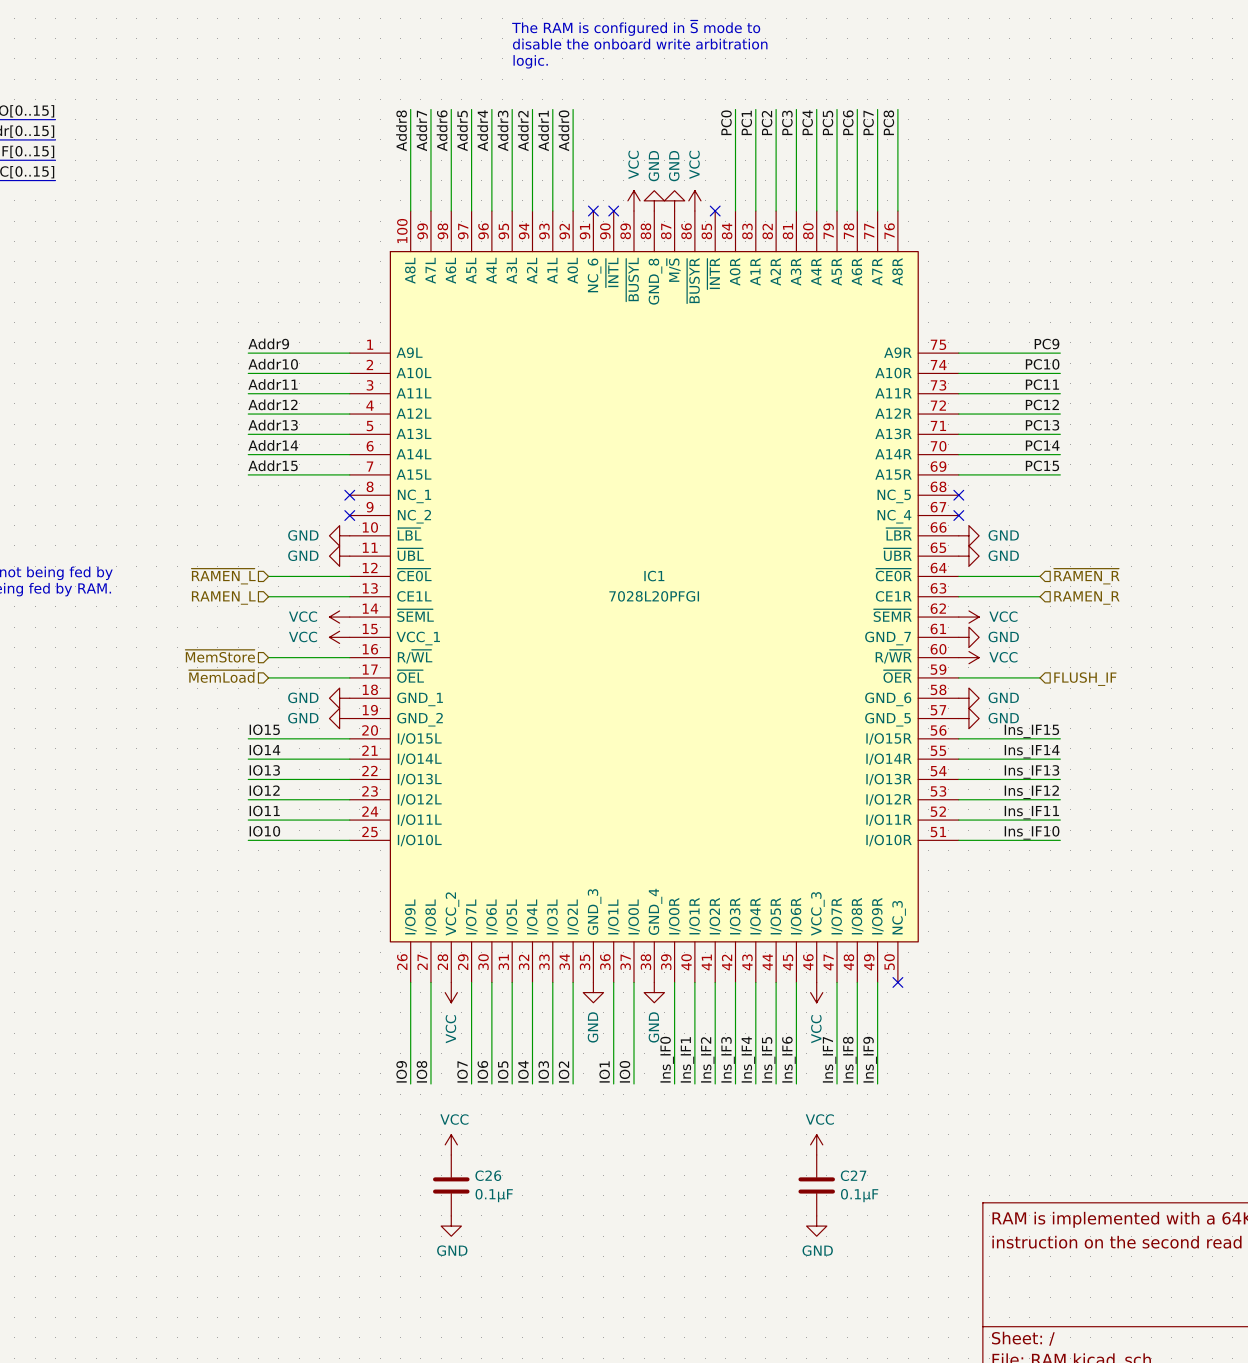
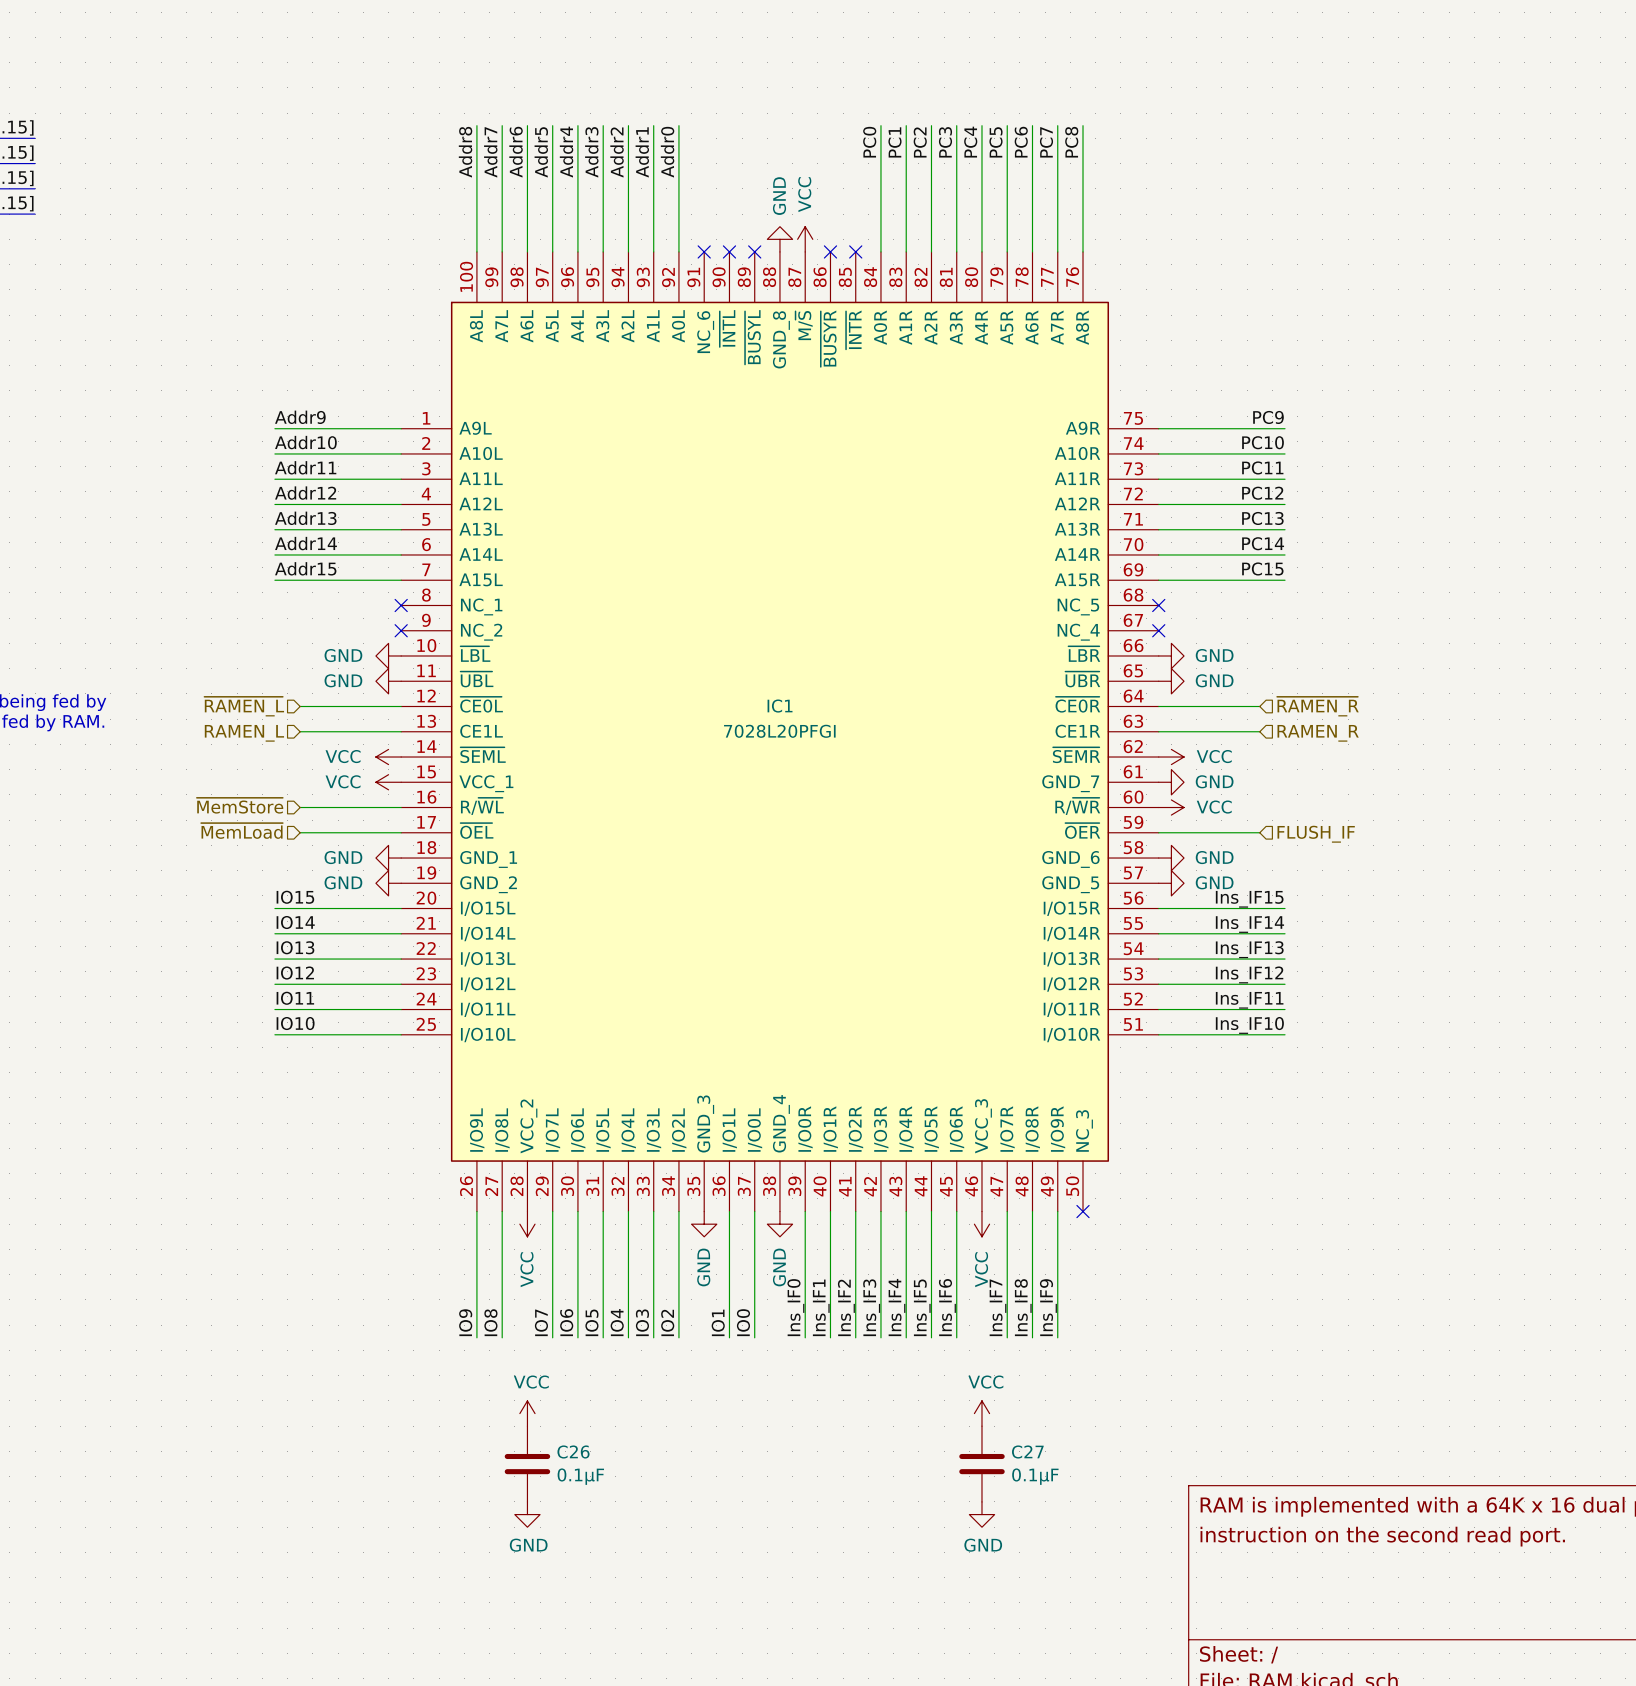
text: The RAM is configured in ~{S} mode to (636, 28) -> none
text: disable the onboard write arbitration (640, 44) -> none
text: logic. (530, 61) -> none
power symbol: VCC (633, 200) -> none
power symbol: GND (674, 200) -> VCC (805, 239)
power symbol: VCC (694, 200) -> none
no-connect mark: none -> (754, 251)
no-connect mark: none -> (830, 251)

